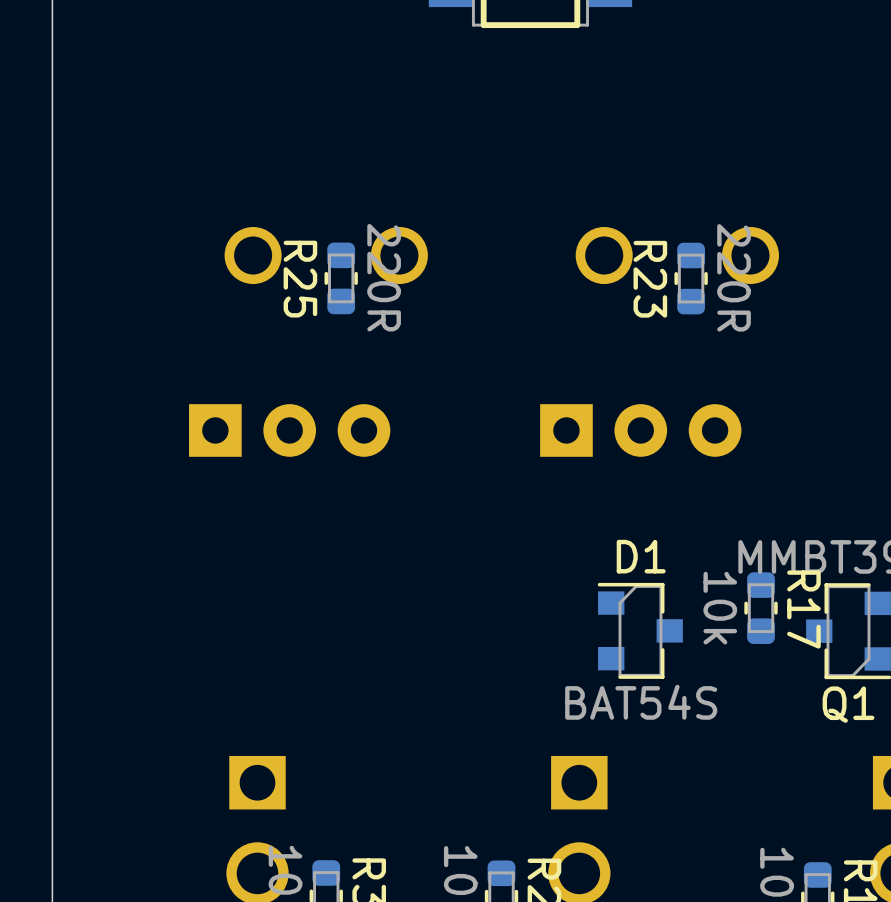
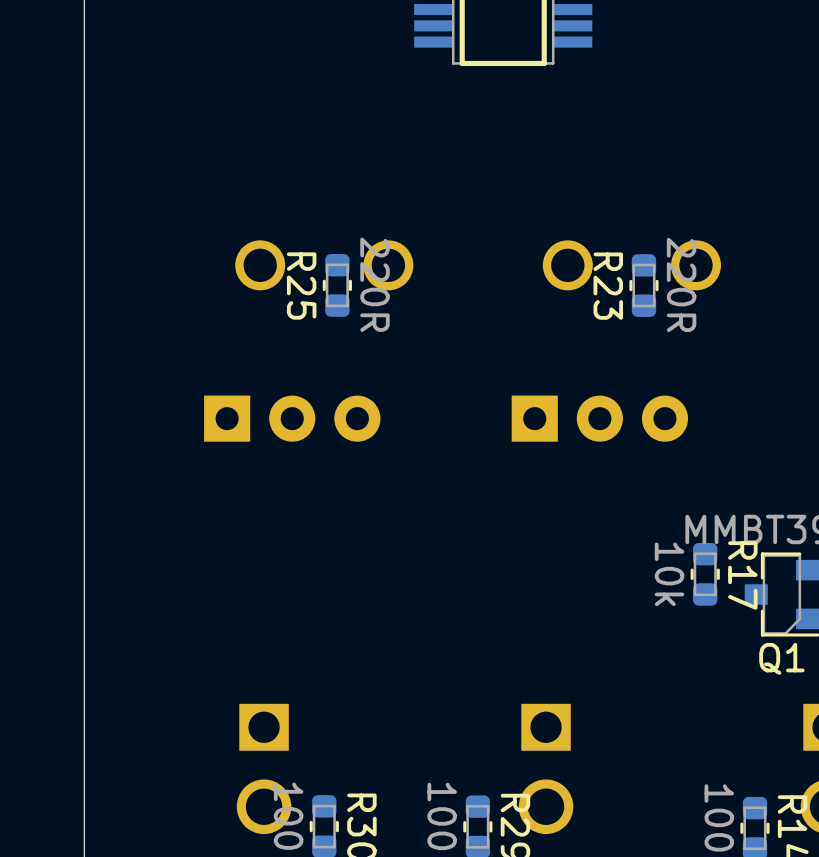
D1: BAT54S (640, 630) -> none

